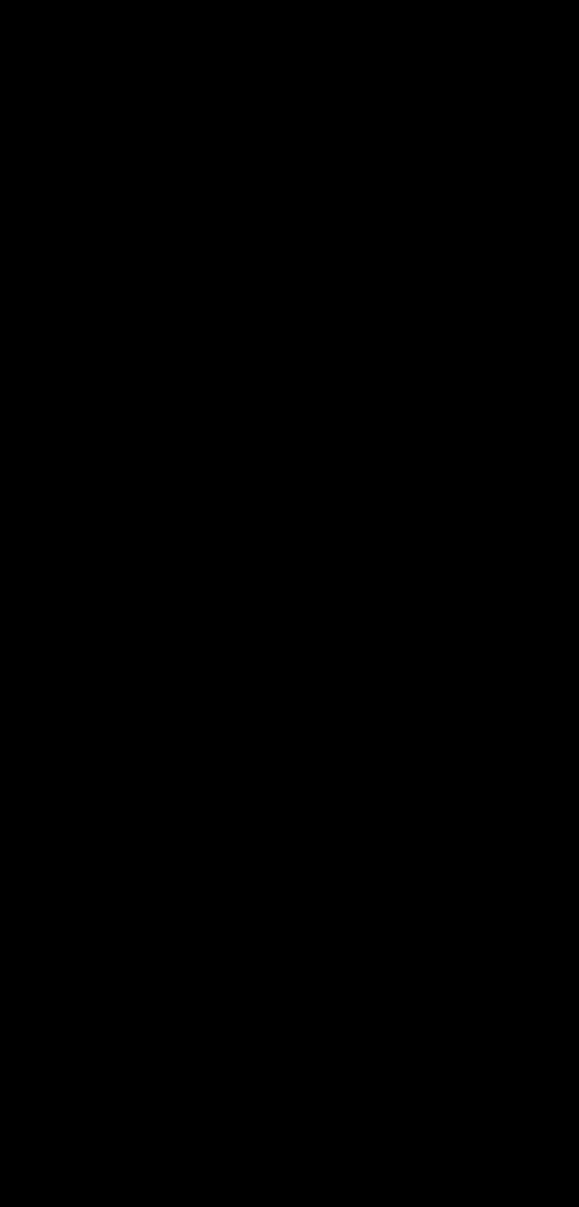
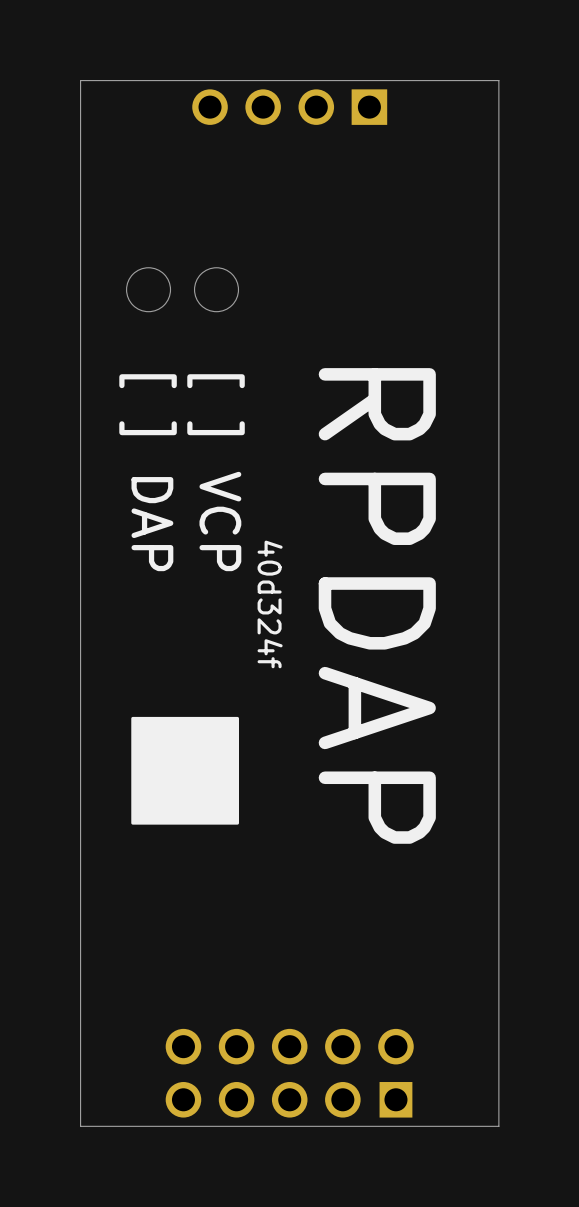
board edge: none -> (498, 80) (80, 80) (80, 1126) (498, 1126) (498, 80)
part: none -> (289, 107)
part: none -> (148, 289)
part: none -> (216, 289)
text: none -> [ ] DAP (148, 472)
text: none -> [ ] VCP (216, 472)
text: none -> 40d324f (270, 604)
text: none -> RPDAP (377, 605)
drawing: none -> [131, 716, 239, 825]
part: none -> (289, 1073)

